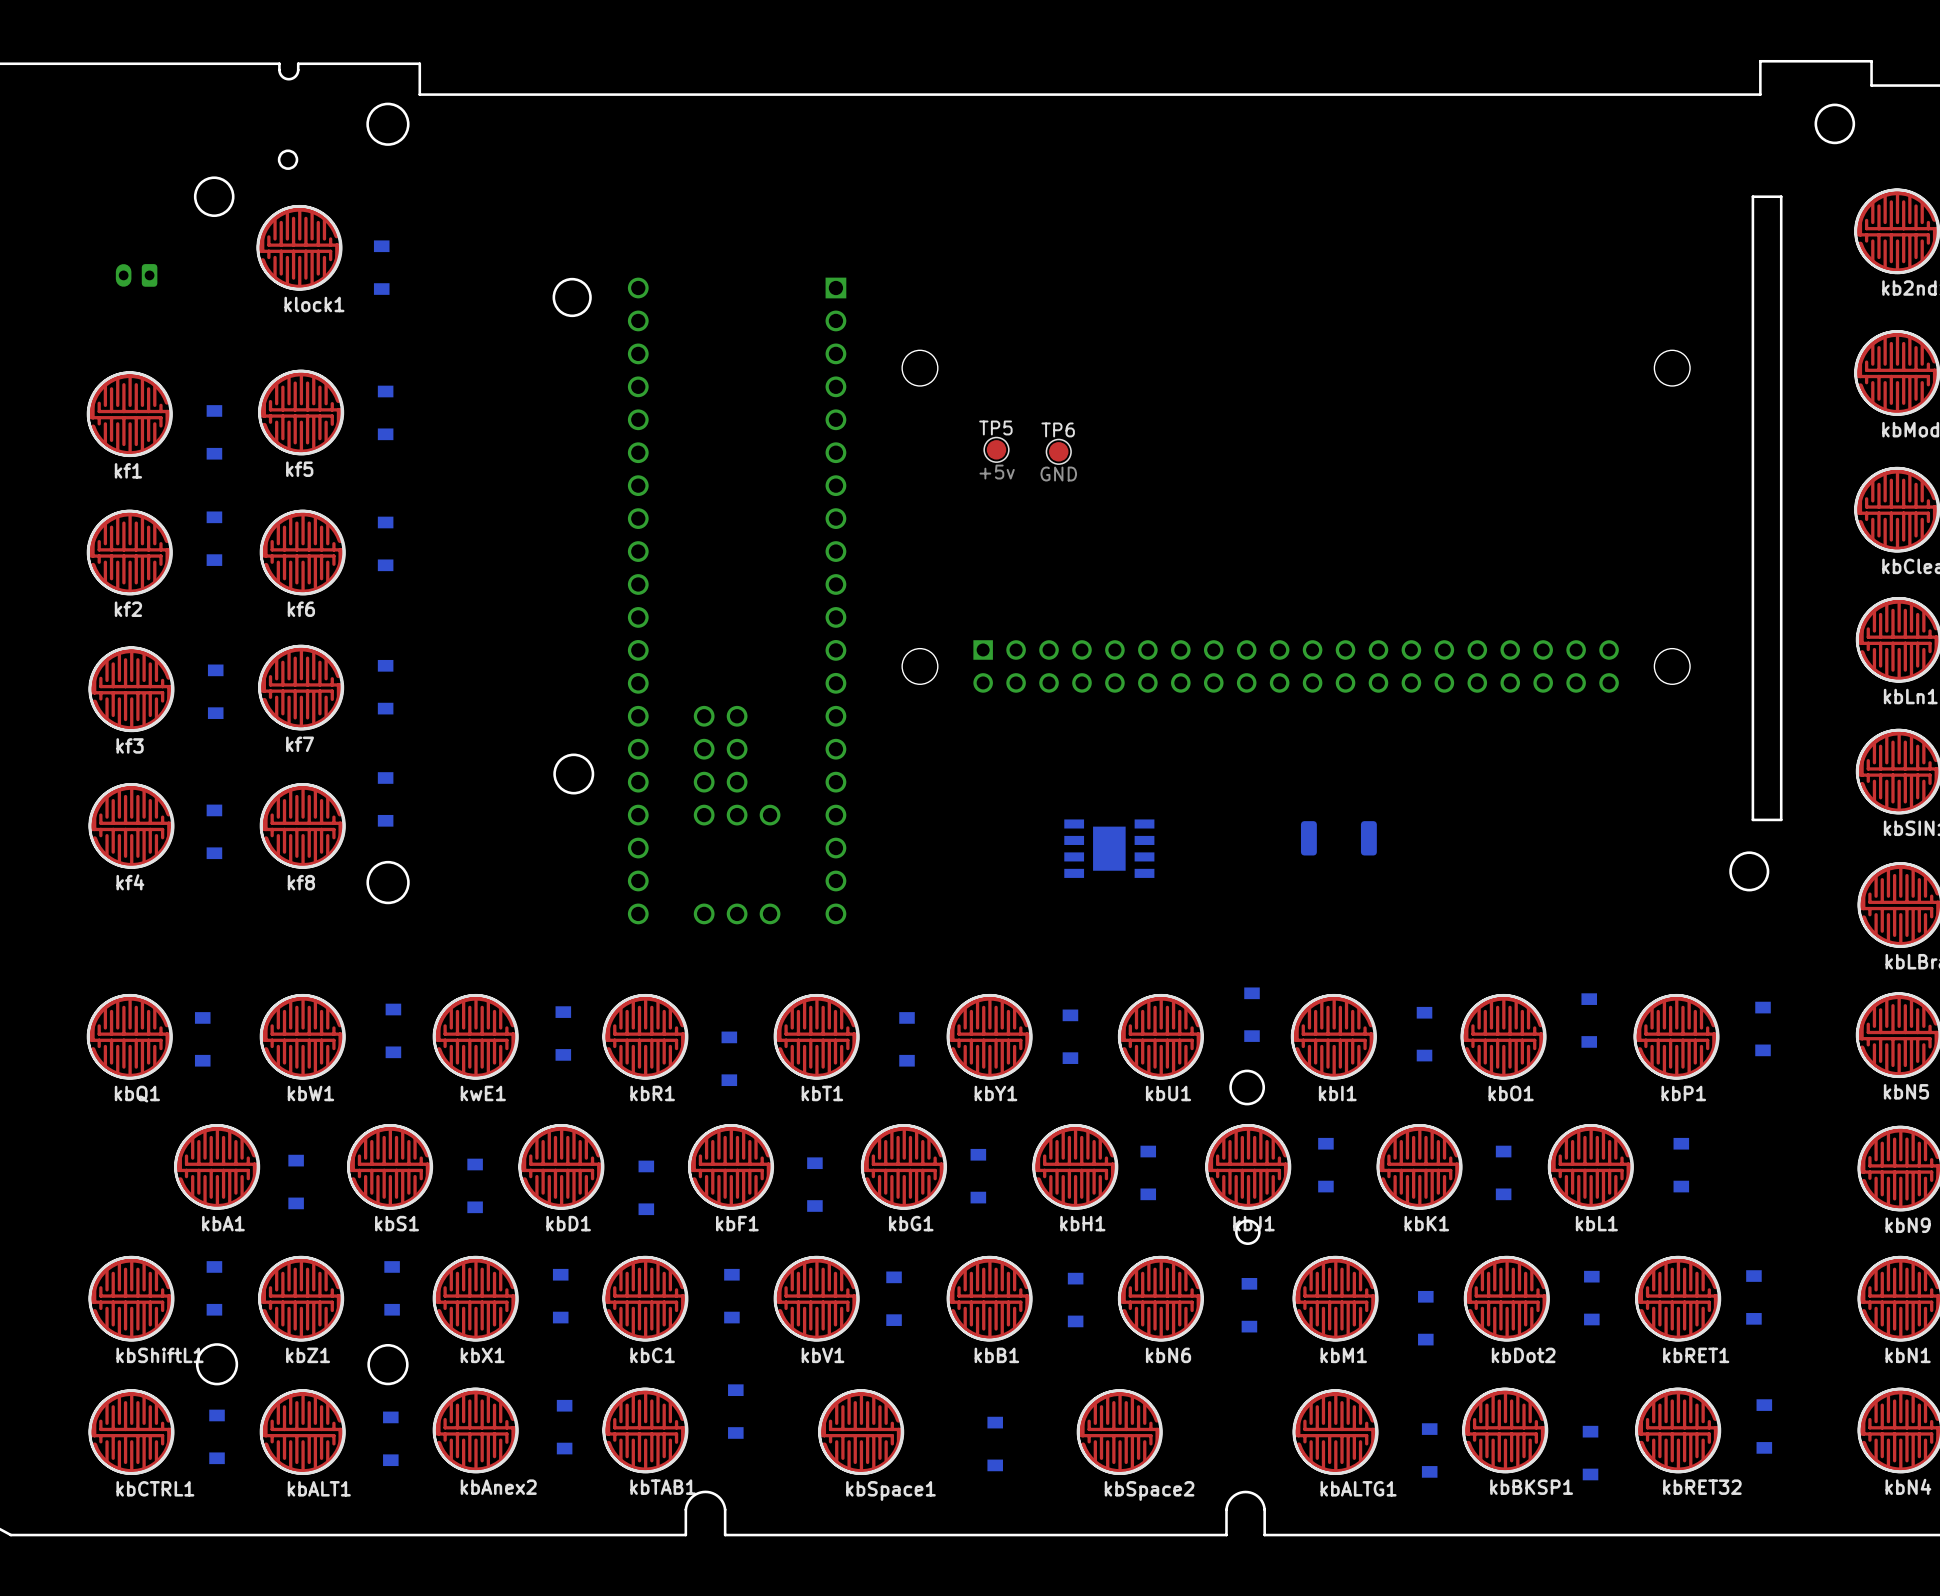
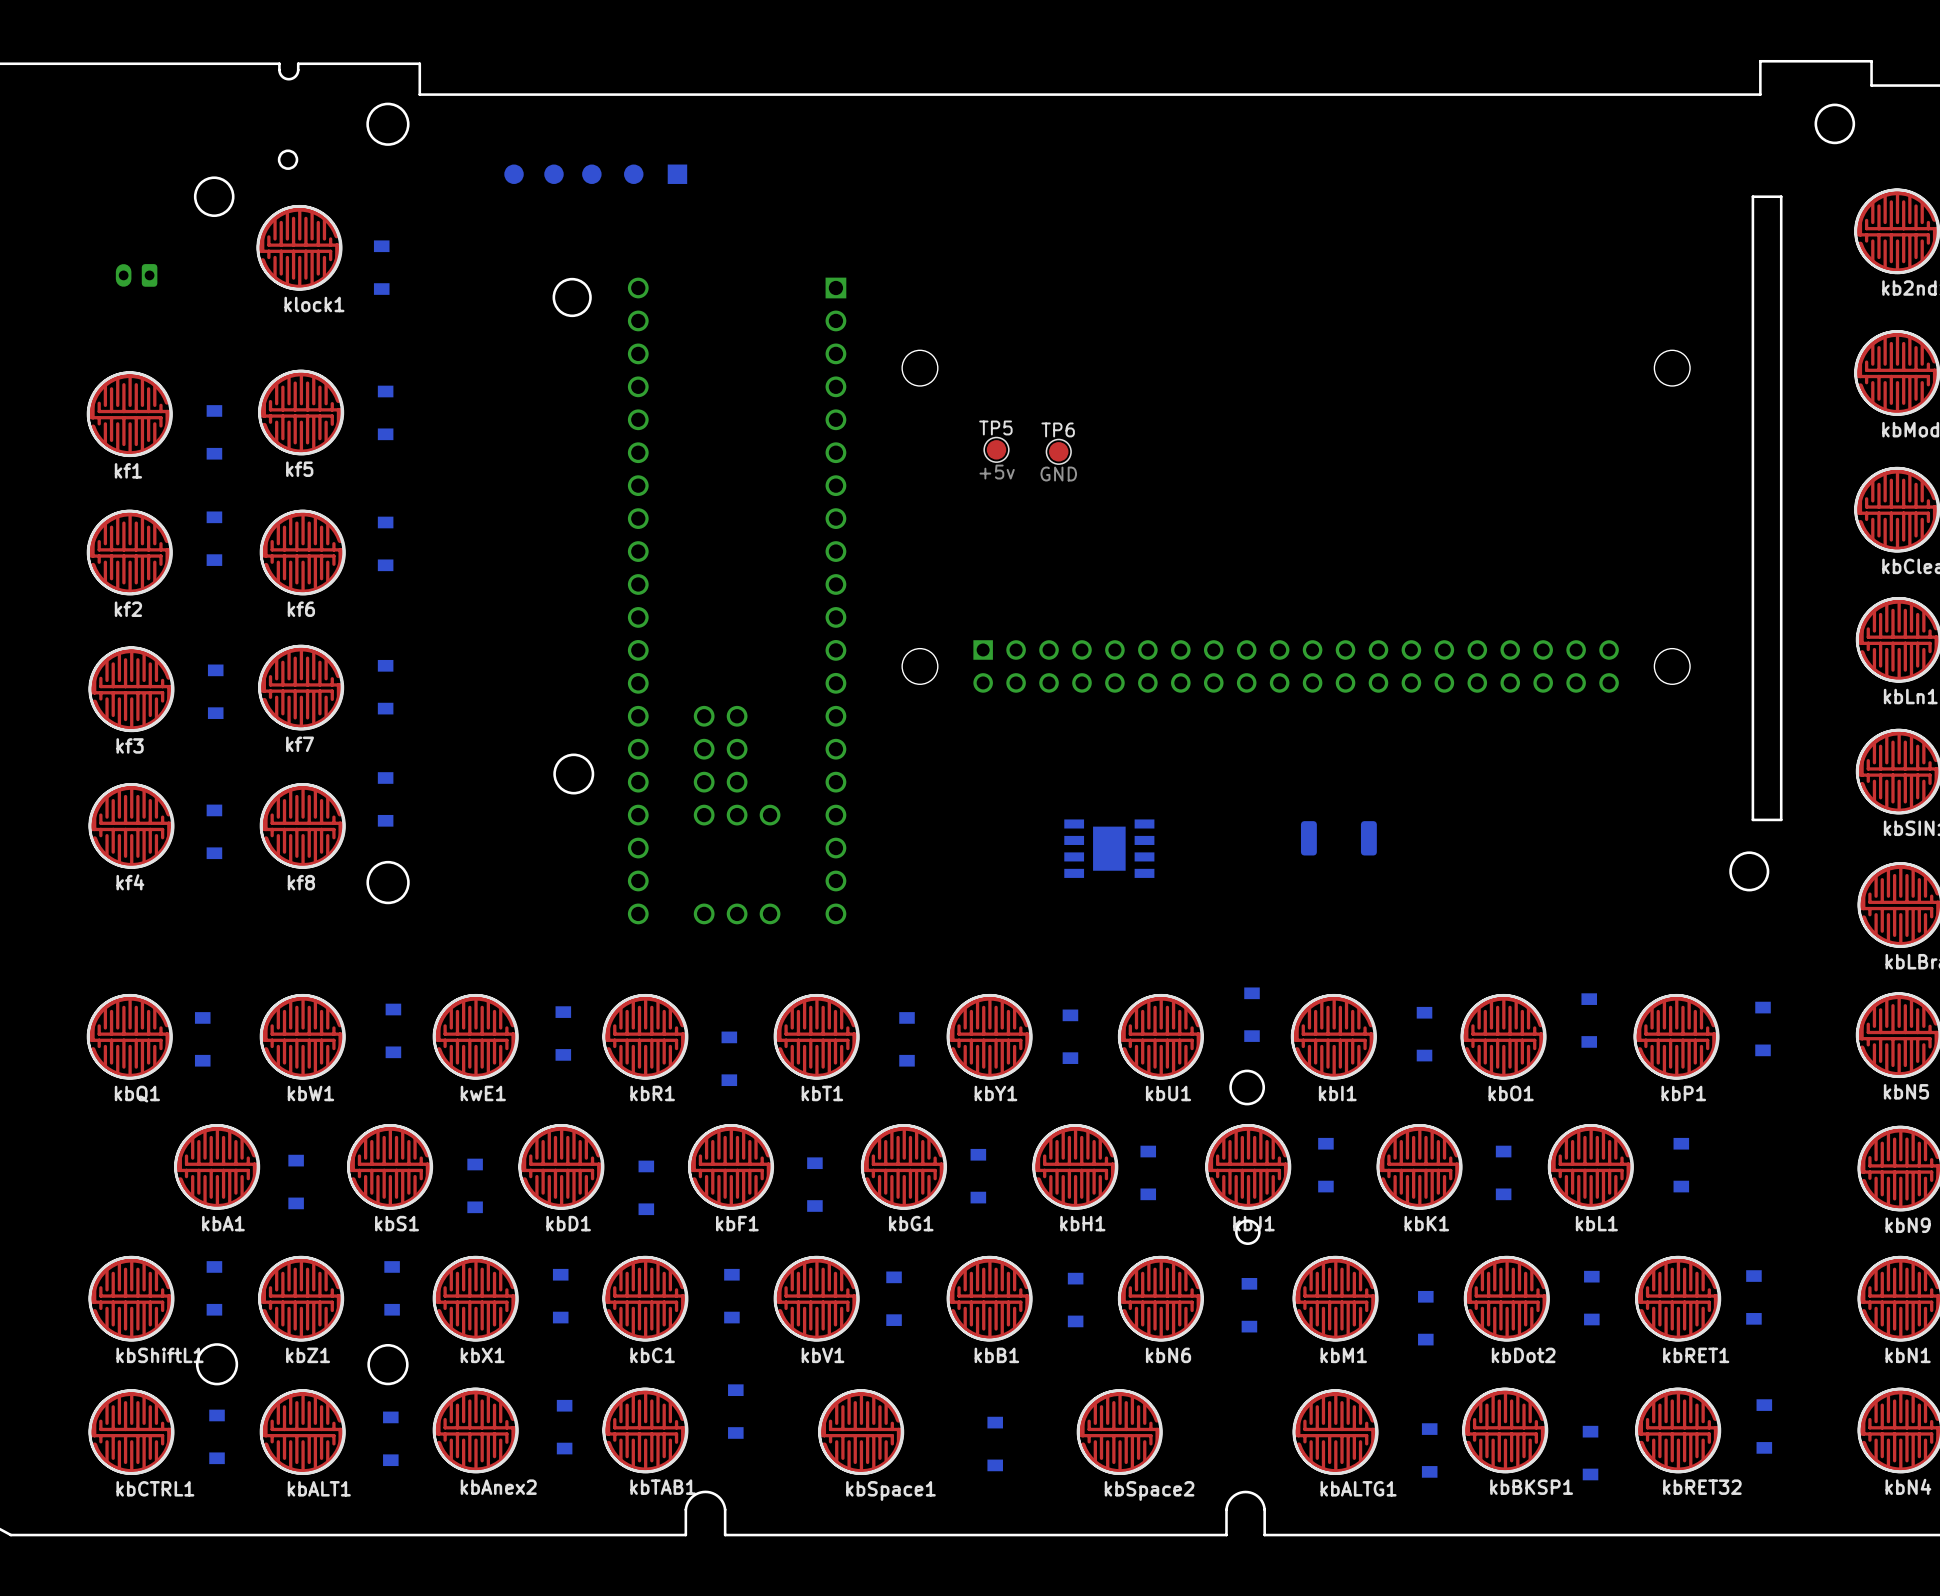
part: none -> (514, 174)
part: none -> (553, 174)
part: none -> (591, 174)
part: none -> (633, 174)
part: none -> (677, 174)

